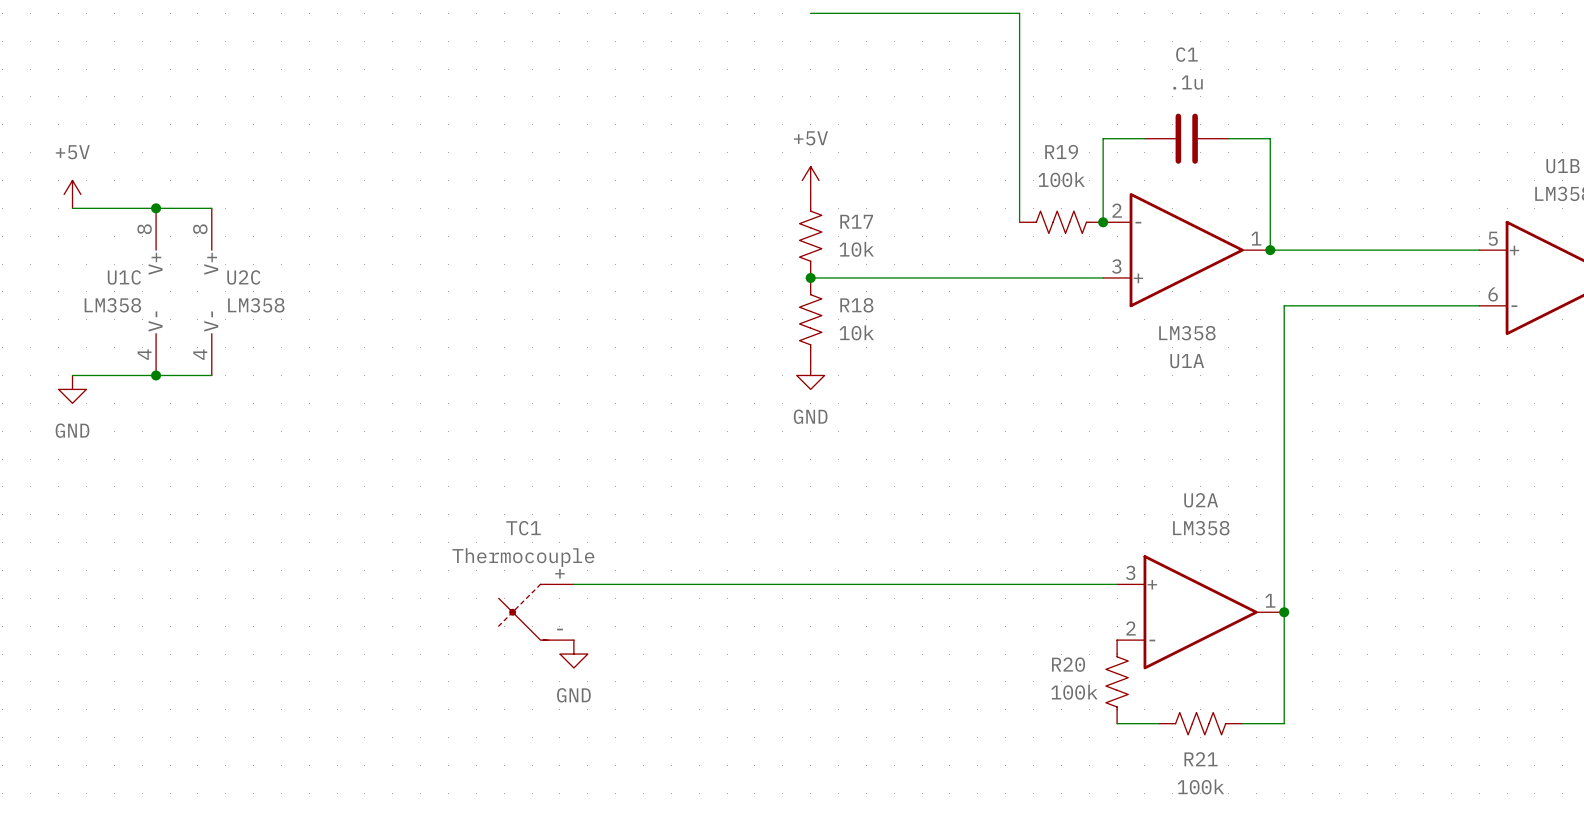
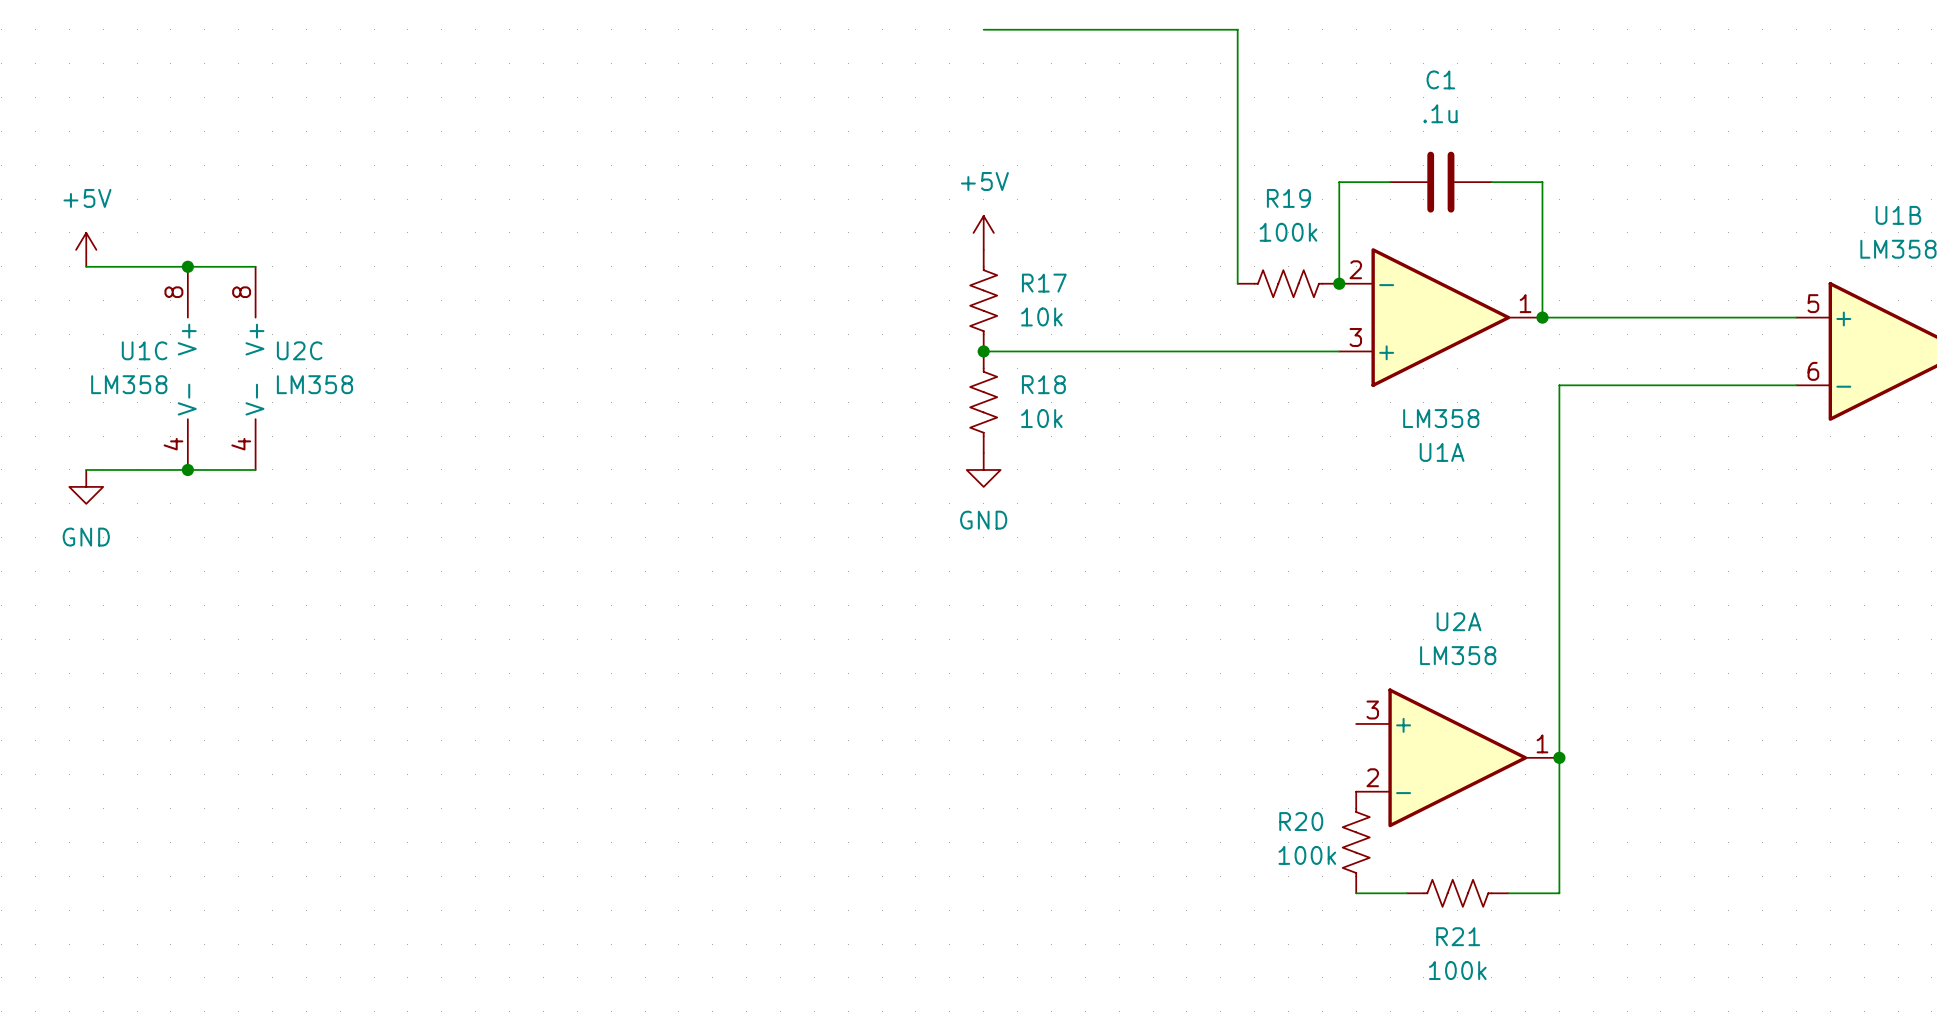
wire: (573, 584) (1117, 584) -> none
TC1: Thermocouple (536, 612) -> none
power symbol: GND (573, 654) -> none

